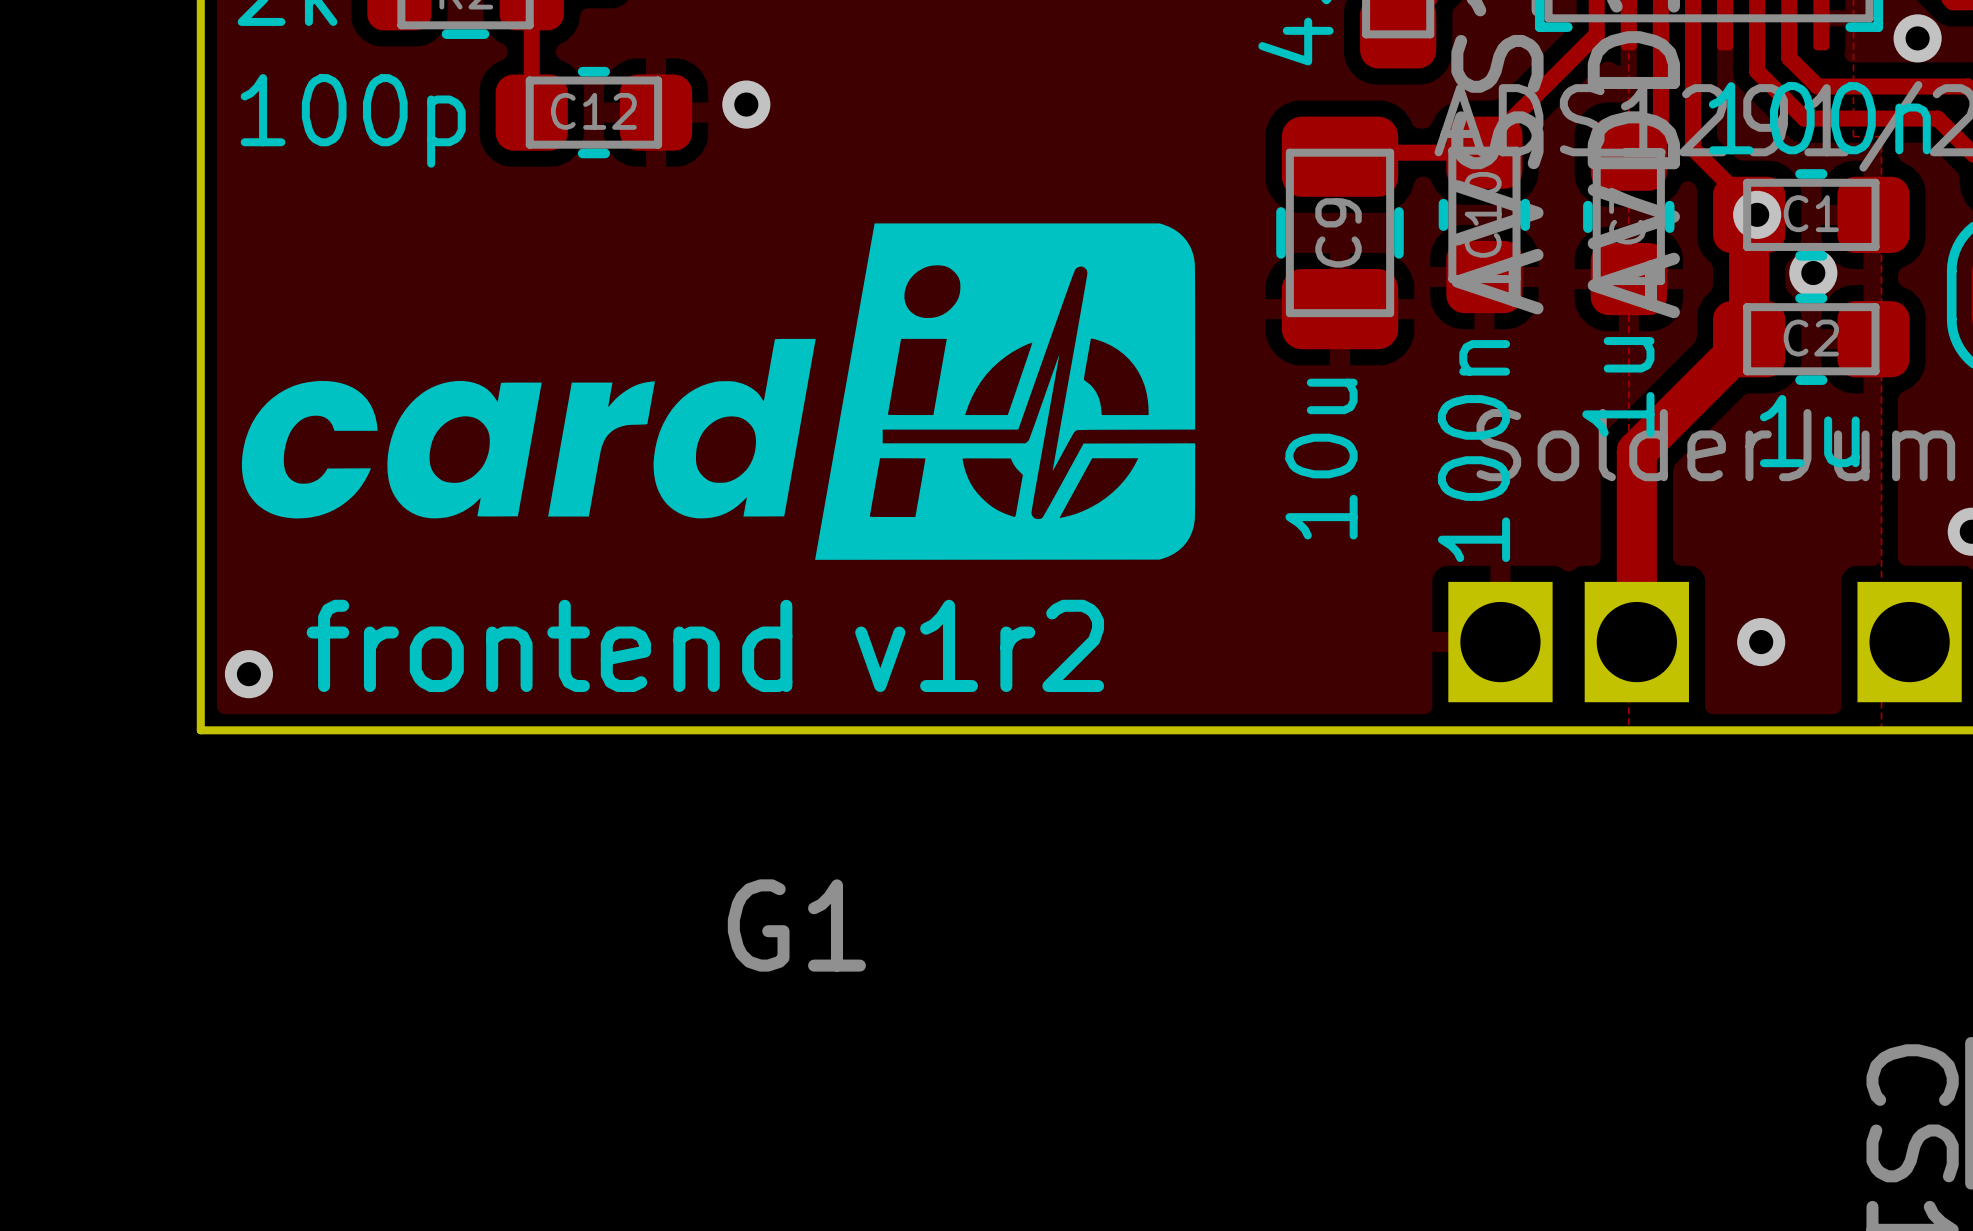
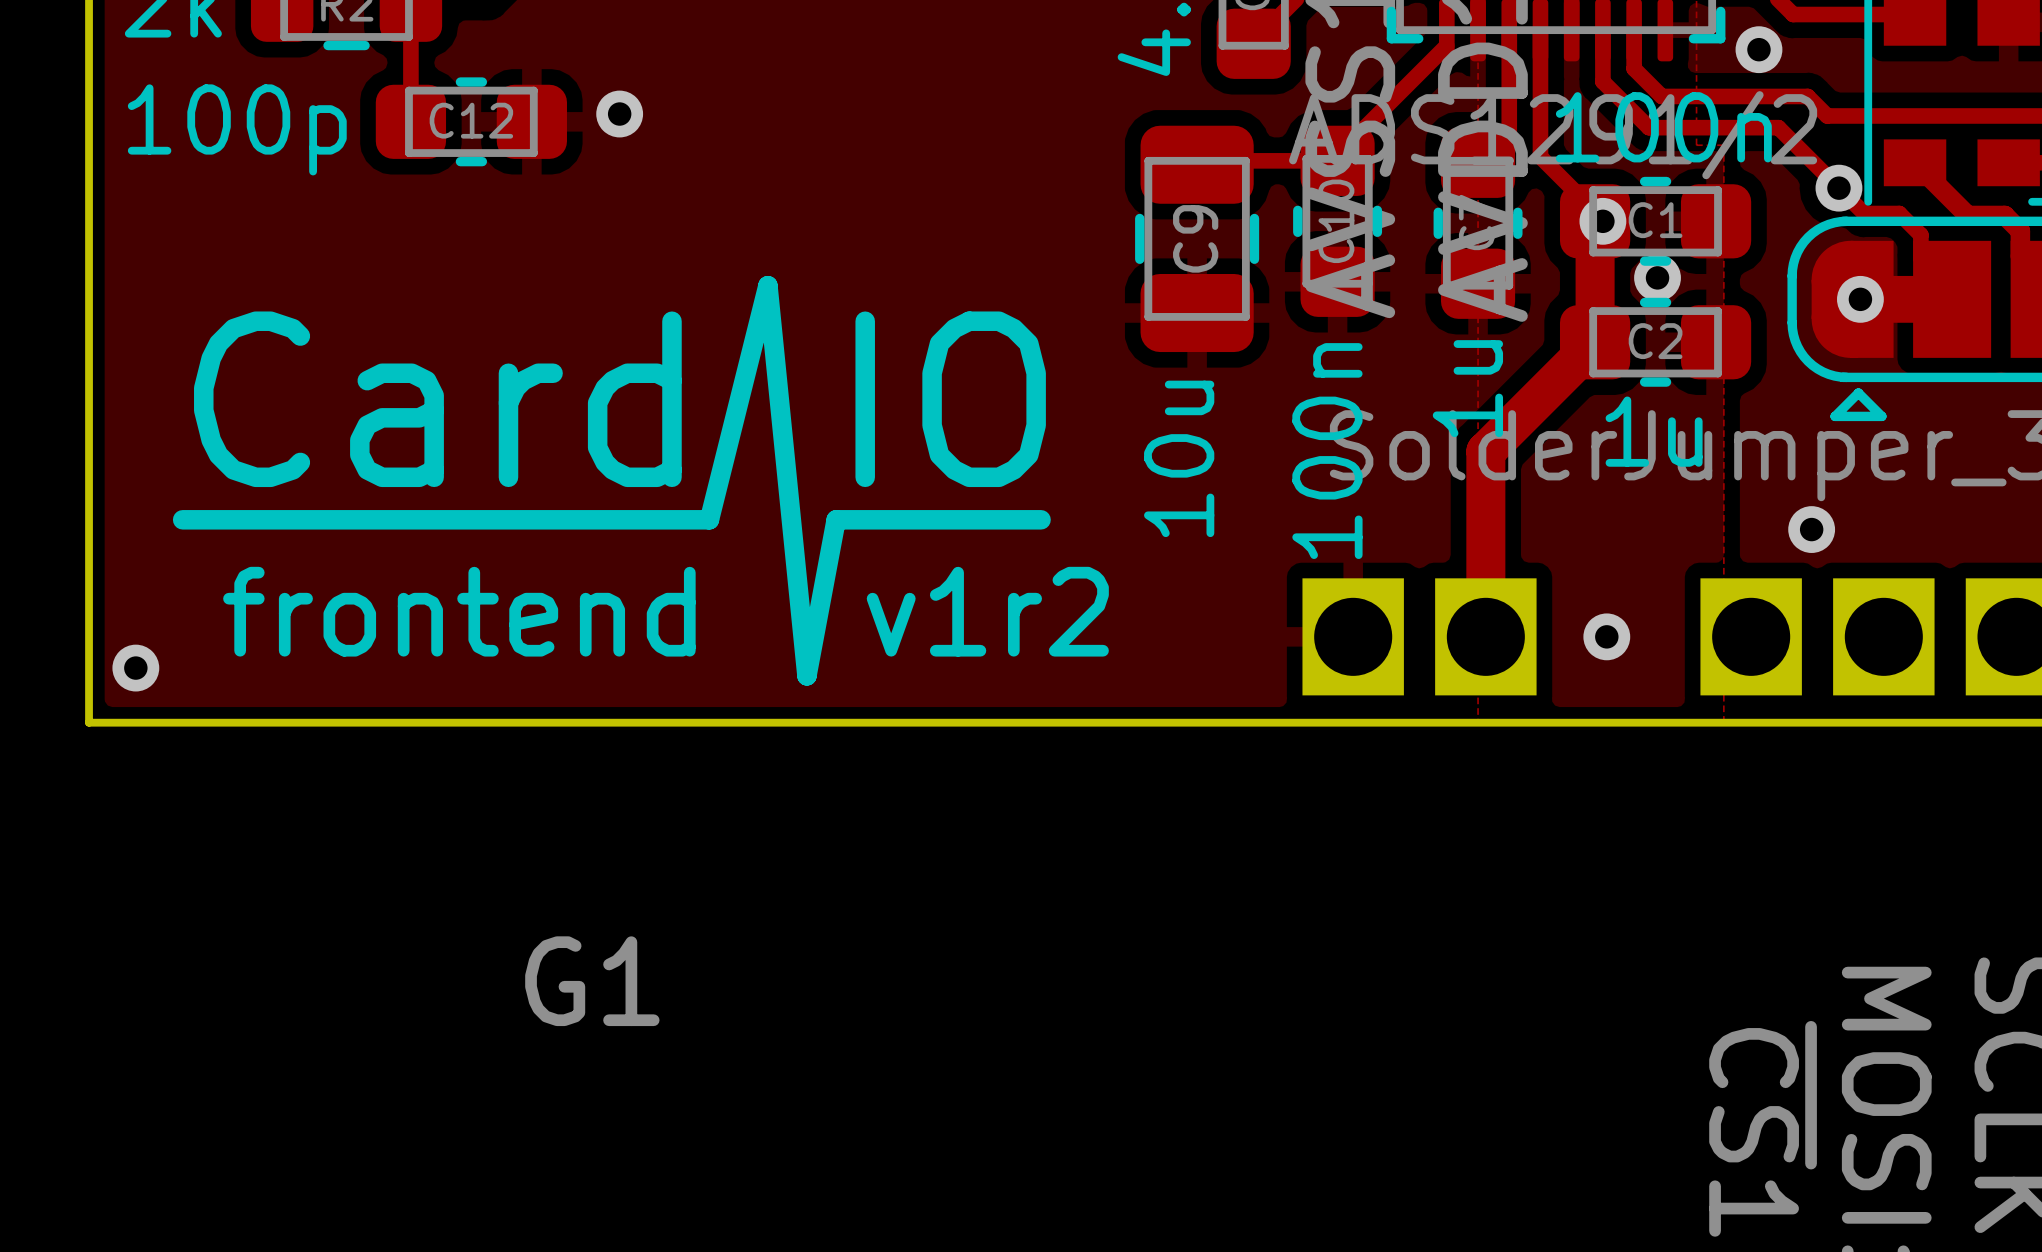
G1 footprint: [241, 223, 1196, 560] -> [172, 275, 1051, 686]
text position: frontend (549, 645) -> frontend (459, 611)
text position: v1r2 (979, 645) -> v1r2 (987, 611)

